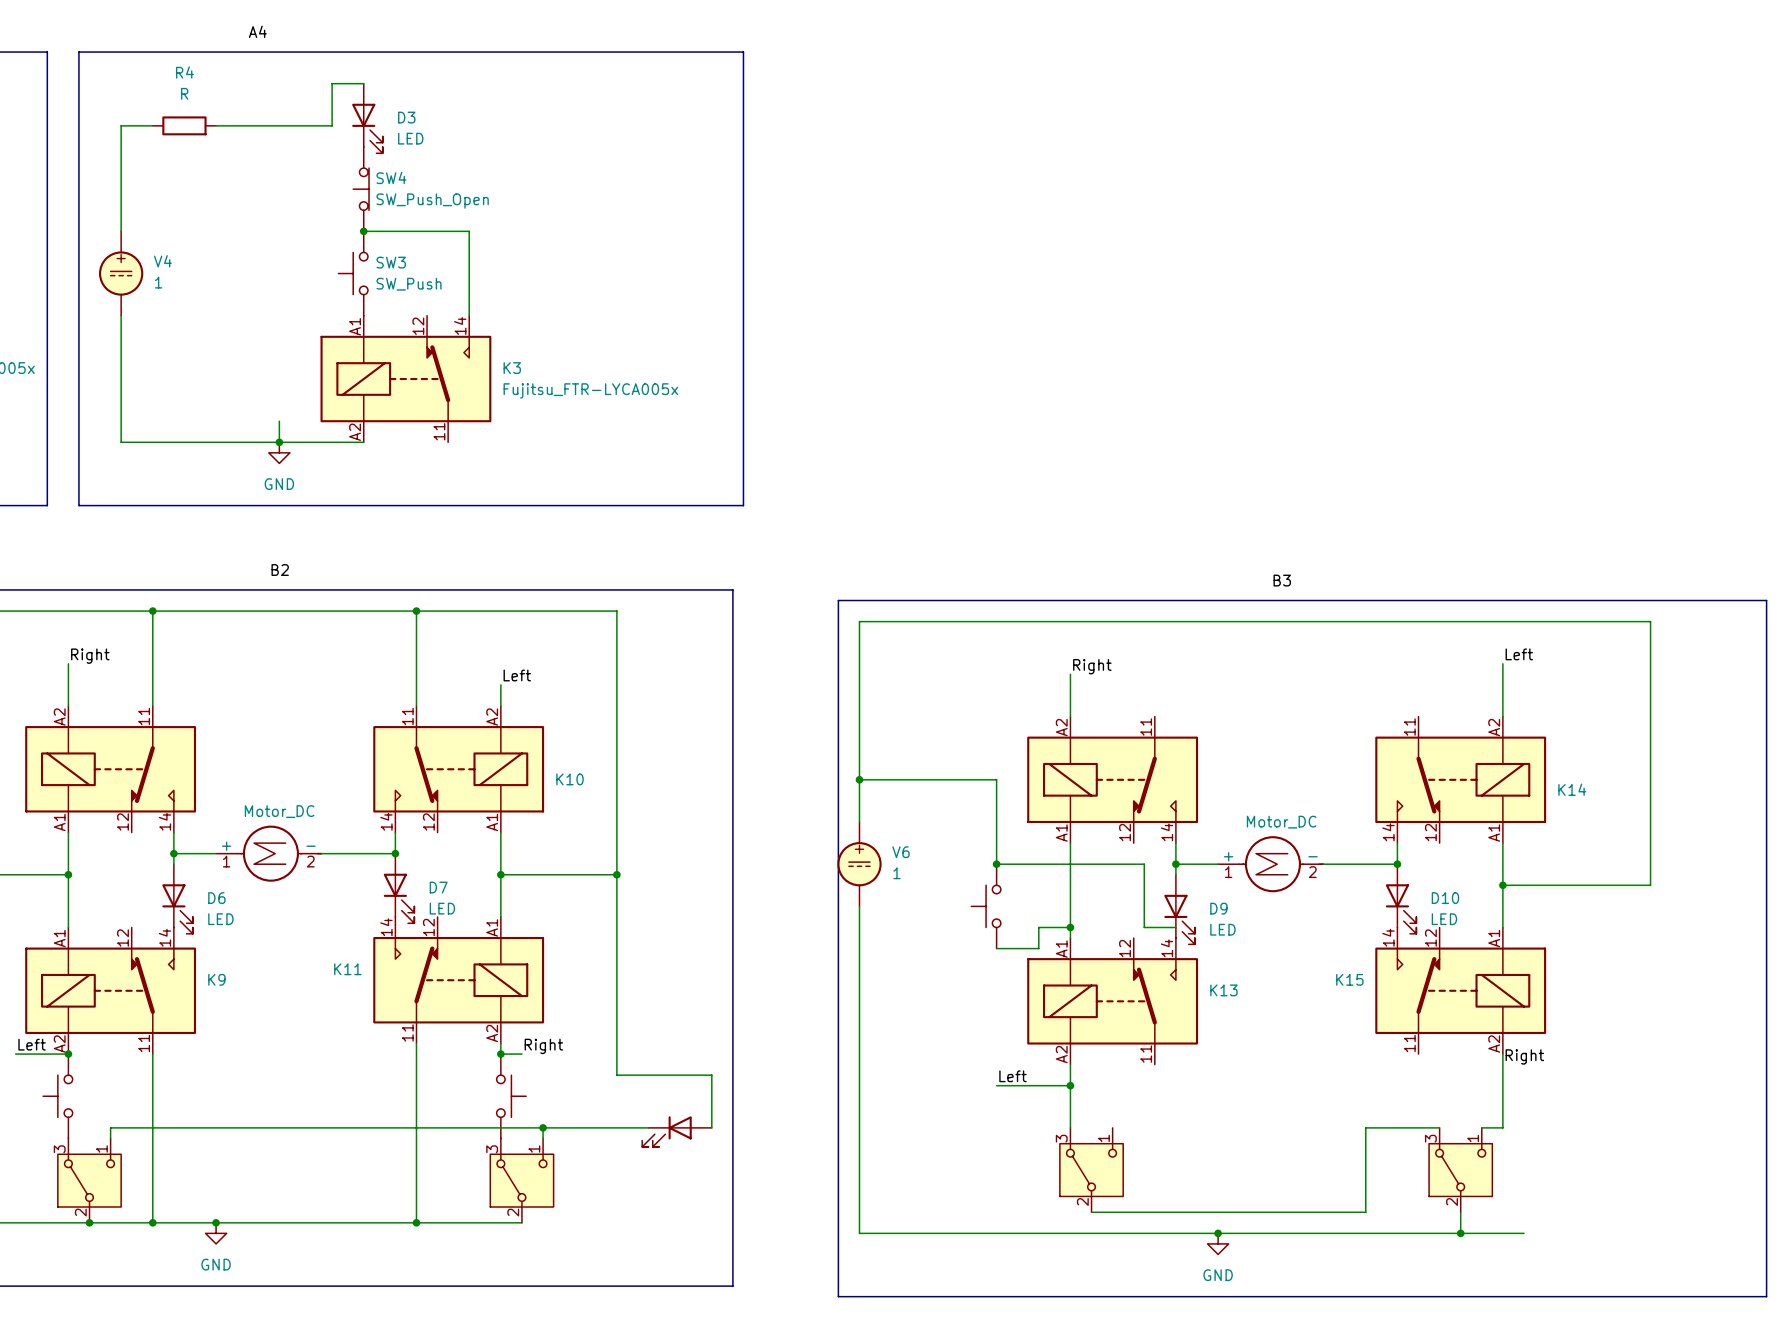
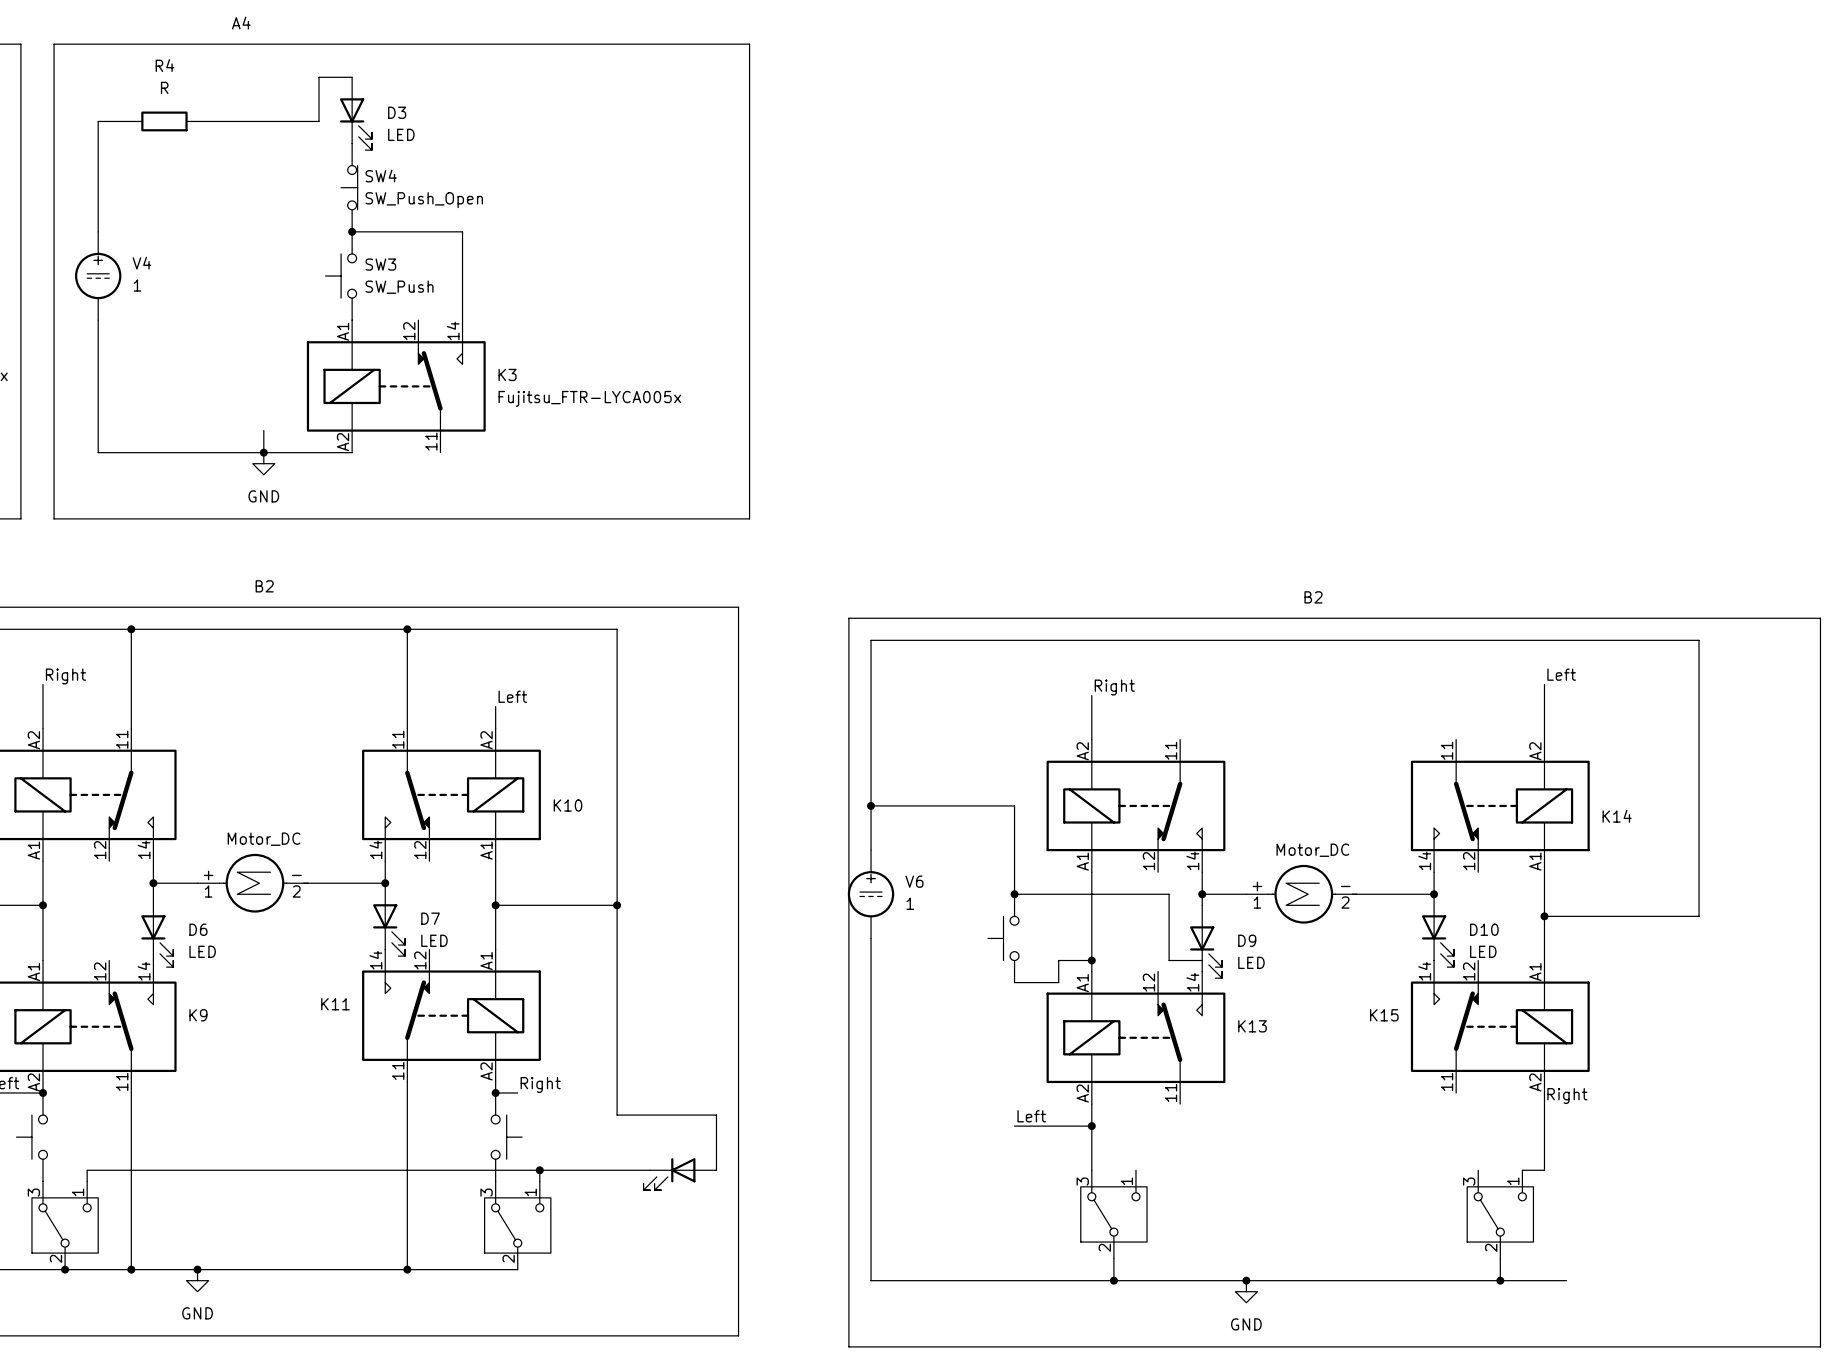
label: B3 (1282, 580) -> B2 (1313, 597)
wire: (1439, 1127) (1365, 1127) (1365, 1212) (1091, 1212) -> (1113, 1280) (1113, 1258)
junction: none -> (1113, 1280)

